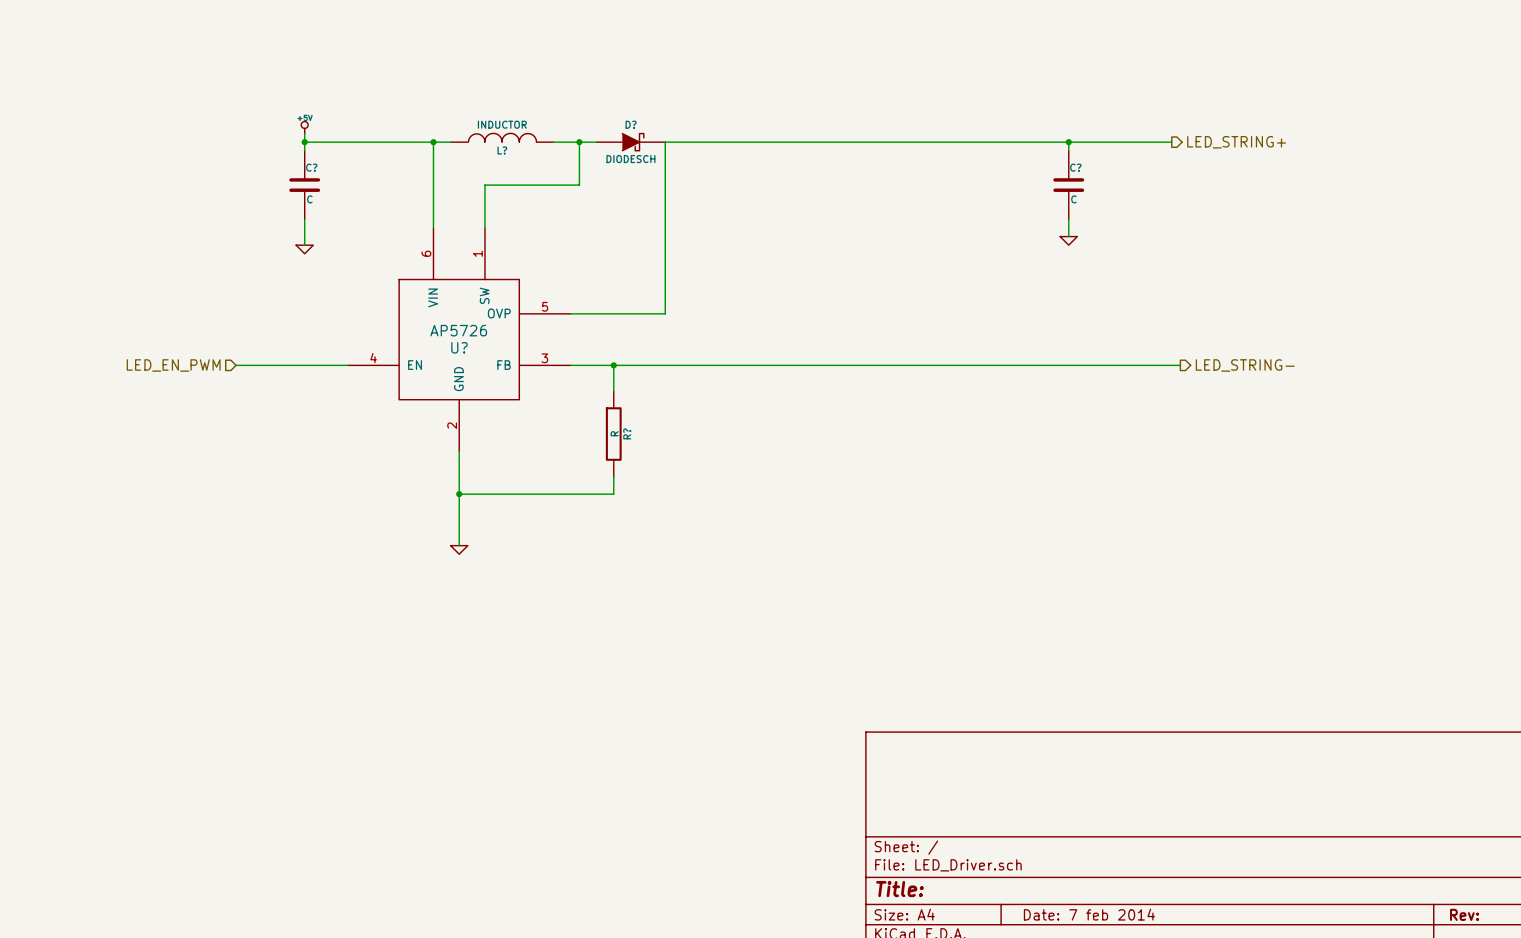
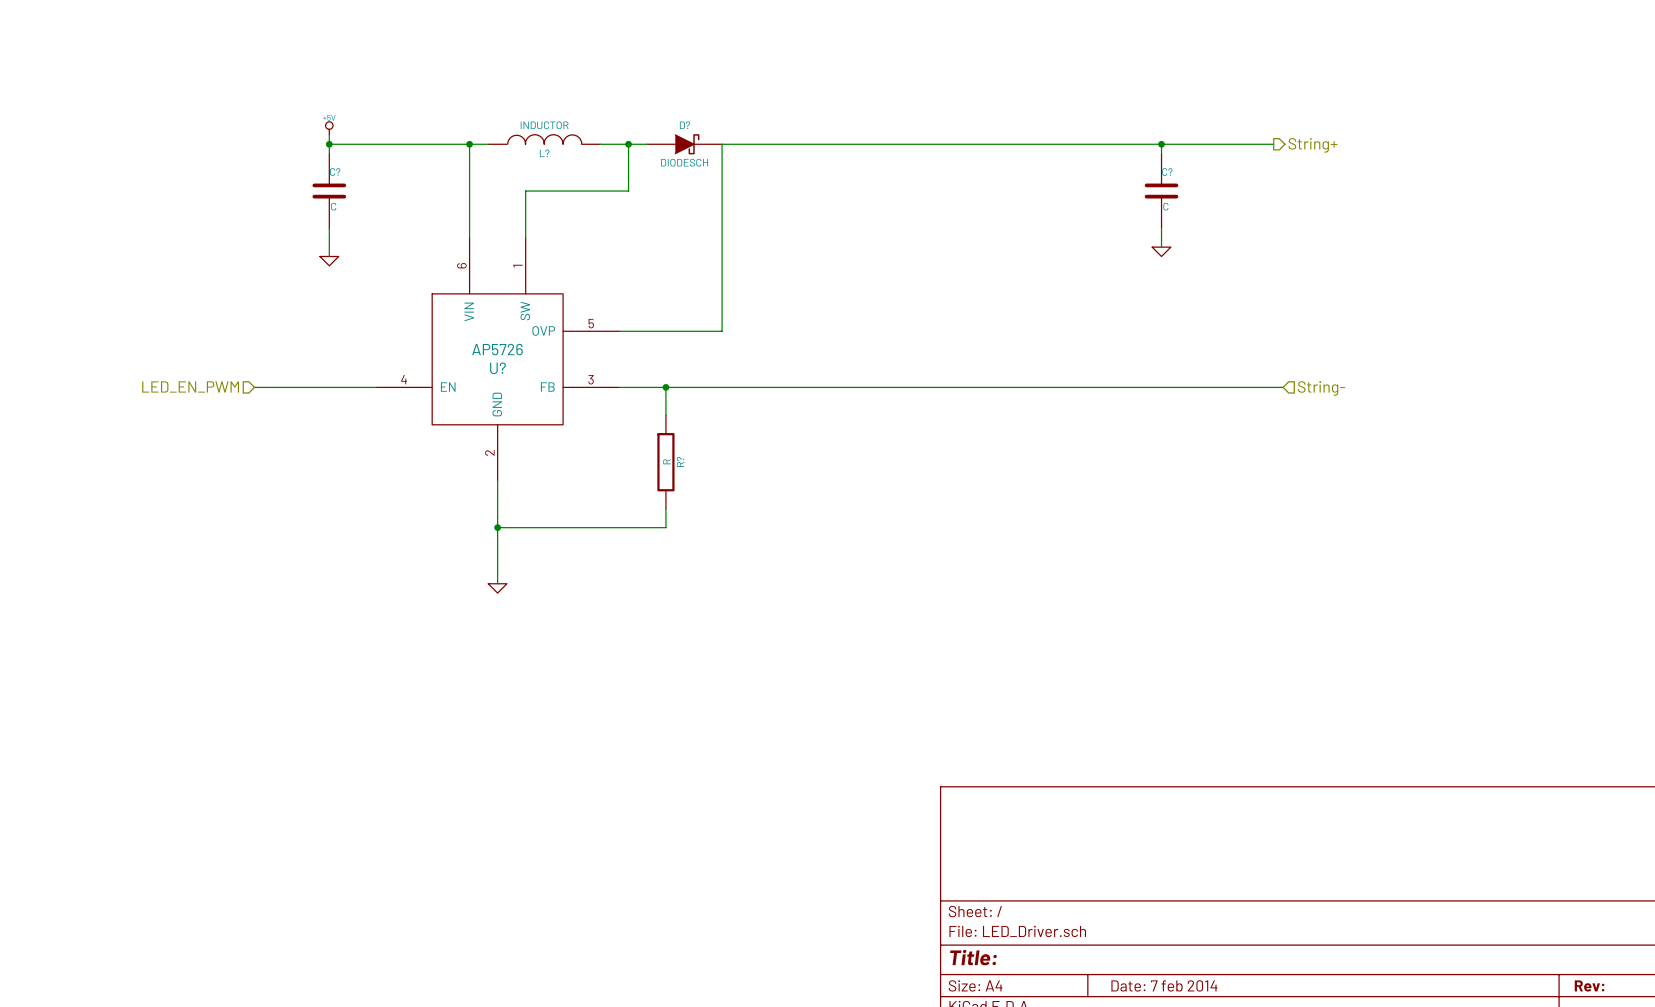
hierarchical label: LED_STRING+ (1236, 142) -> String+ (1313, 145)
hierarchical label shape: output (1245, 365) -> input (1321, 388)
hierarchical label: LED_STRING- (1245, 365) -> String- (1321, 388)

